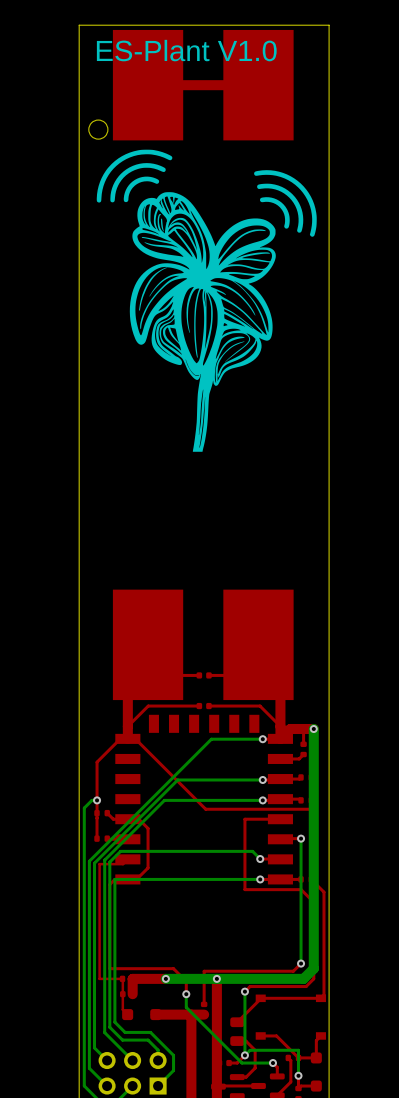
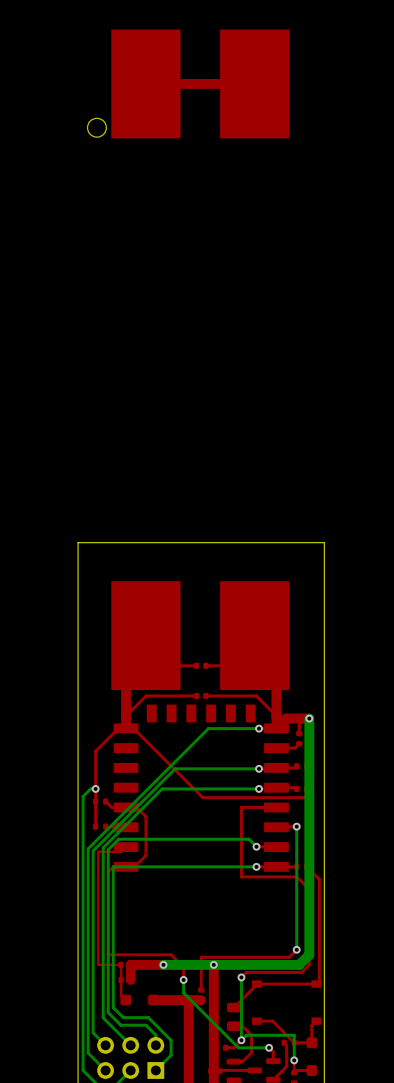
text: ES-Plant V1.0 (186, 50) -> none
drawing: [96, 149, 317, 452] -> none
board edge: (329, 550) (329, 25) (79, 25) (79, 550) -> (324, 542) (78, 542)

